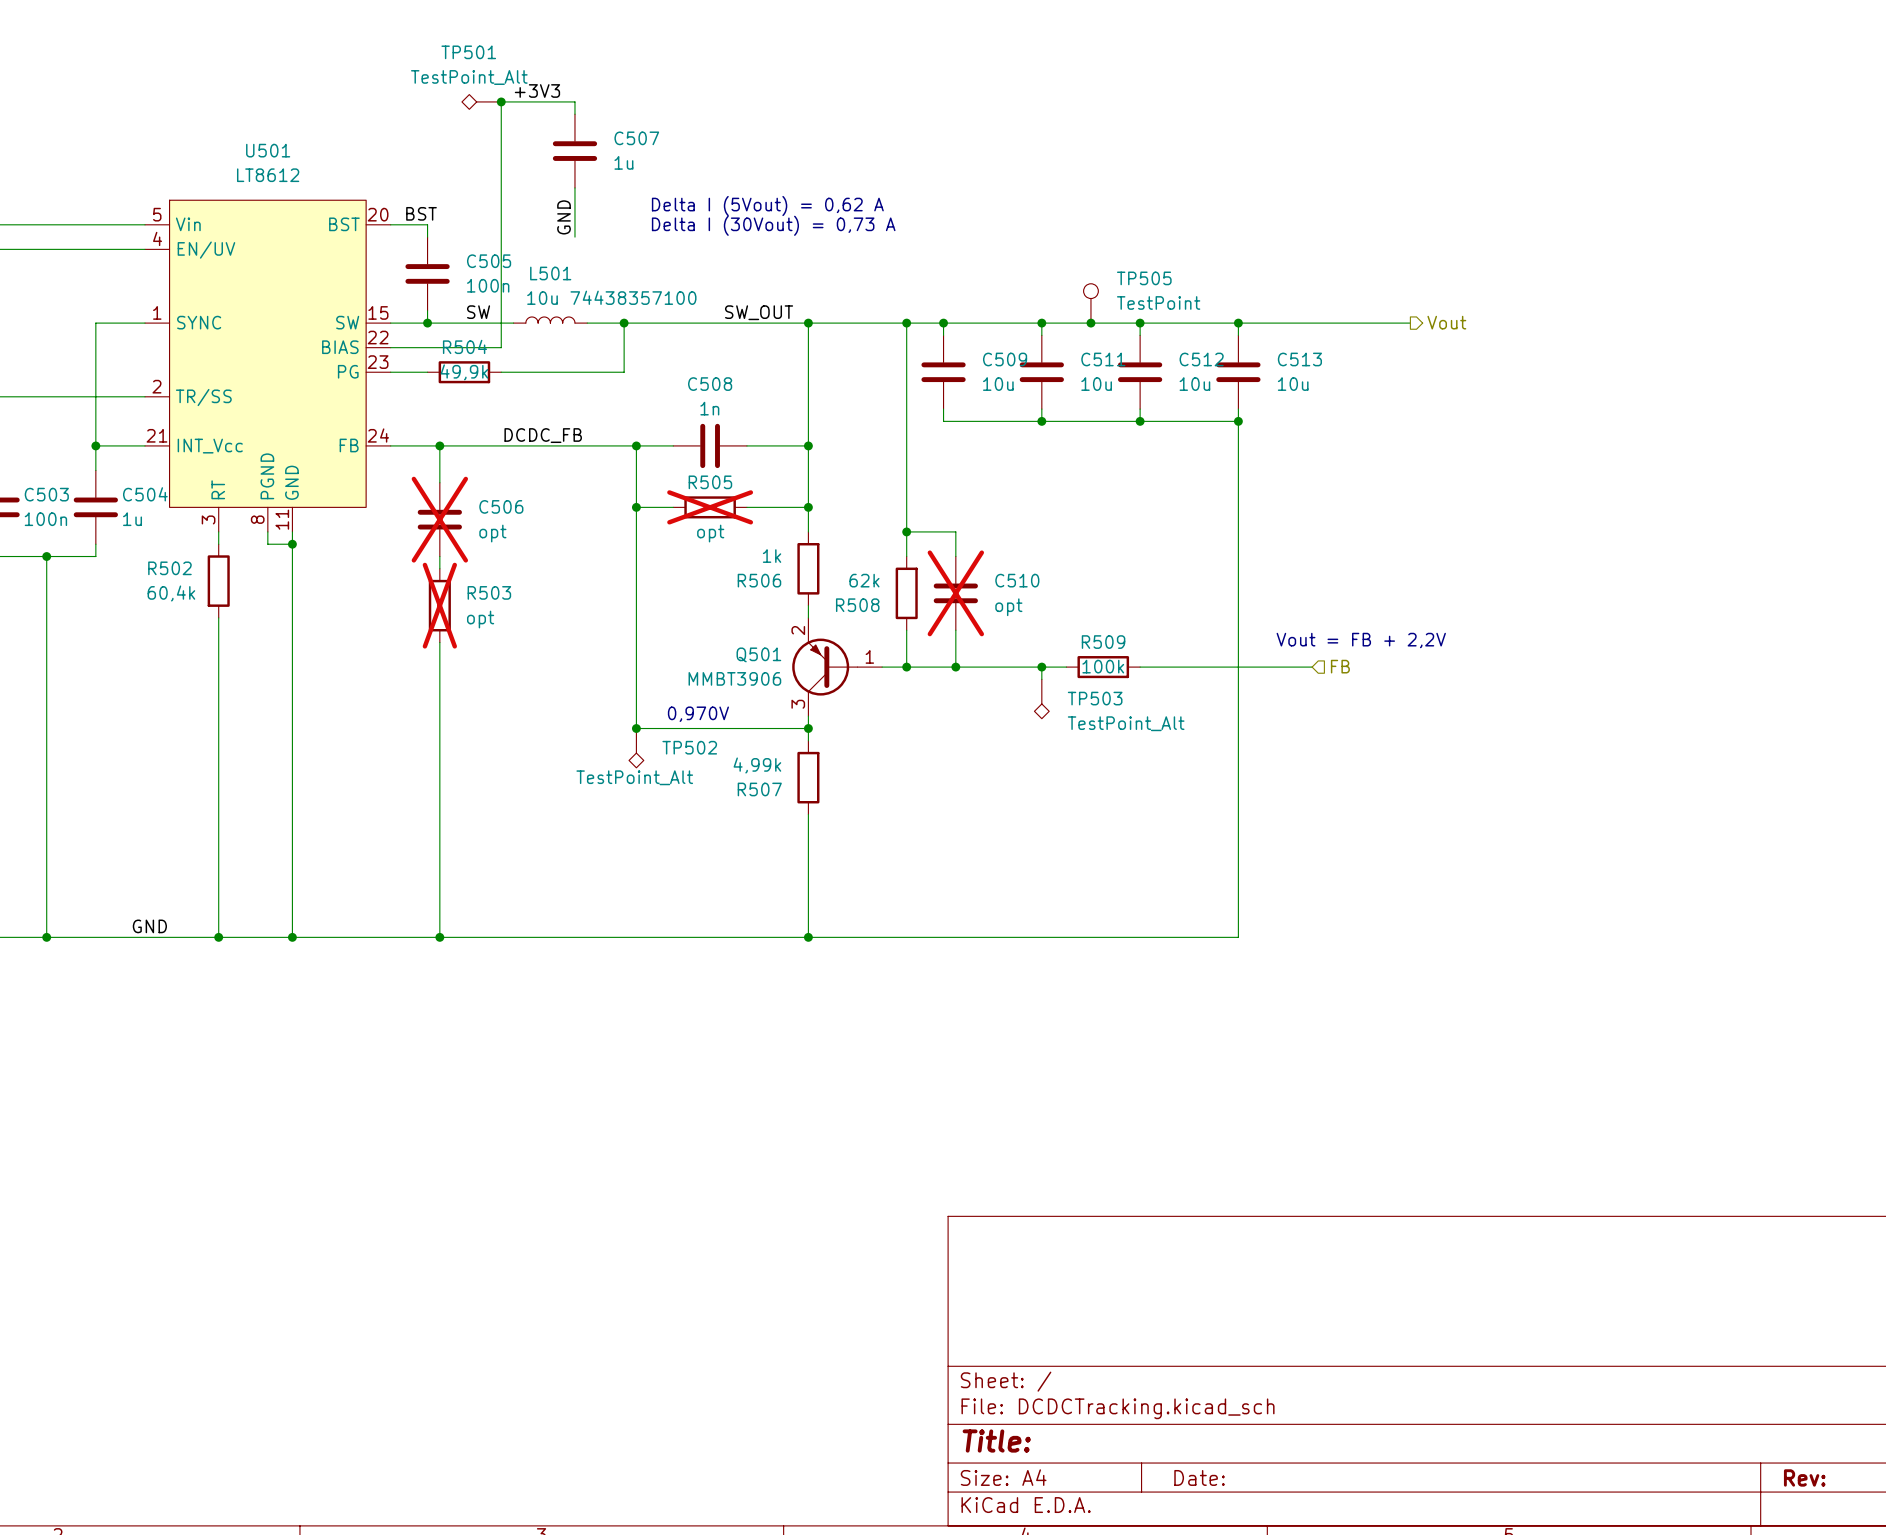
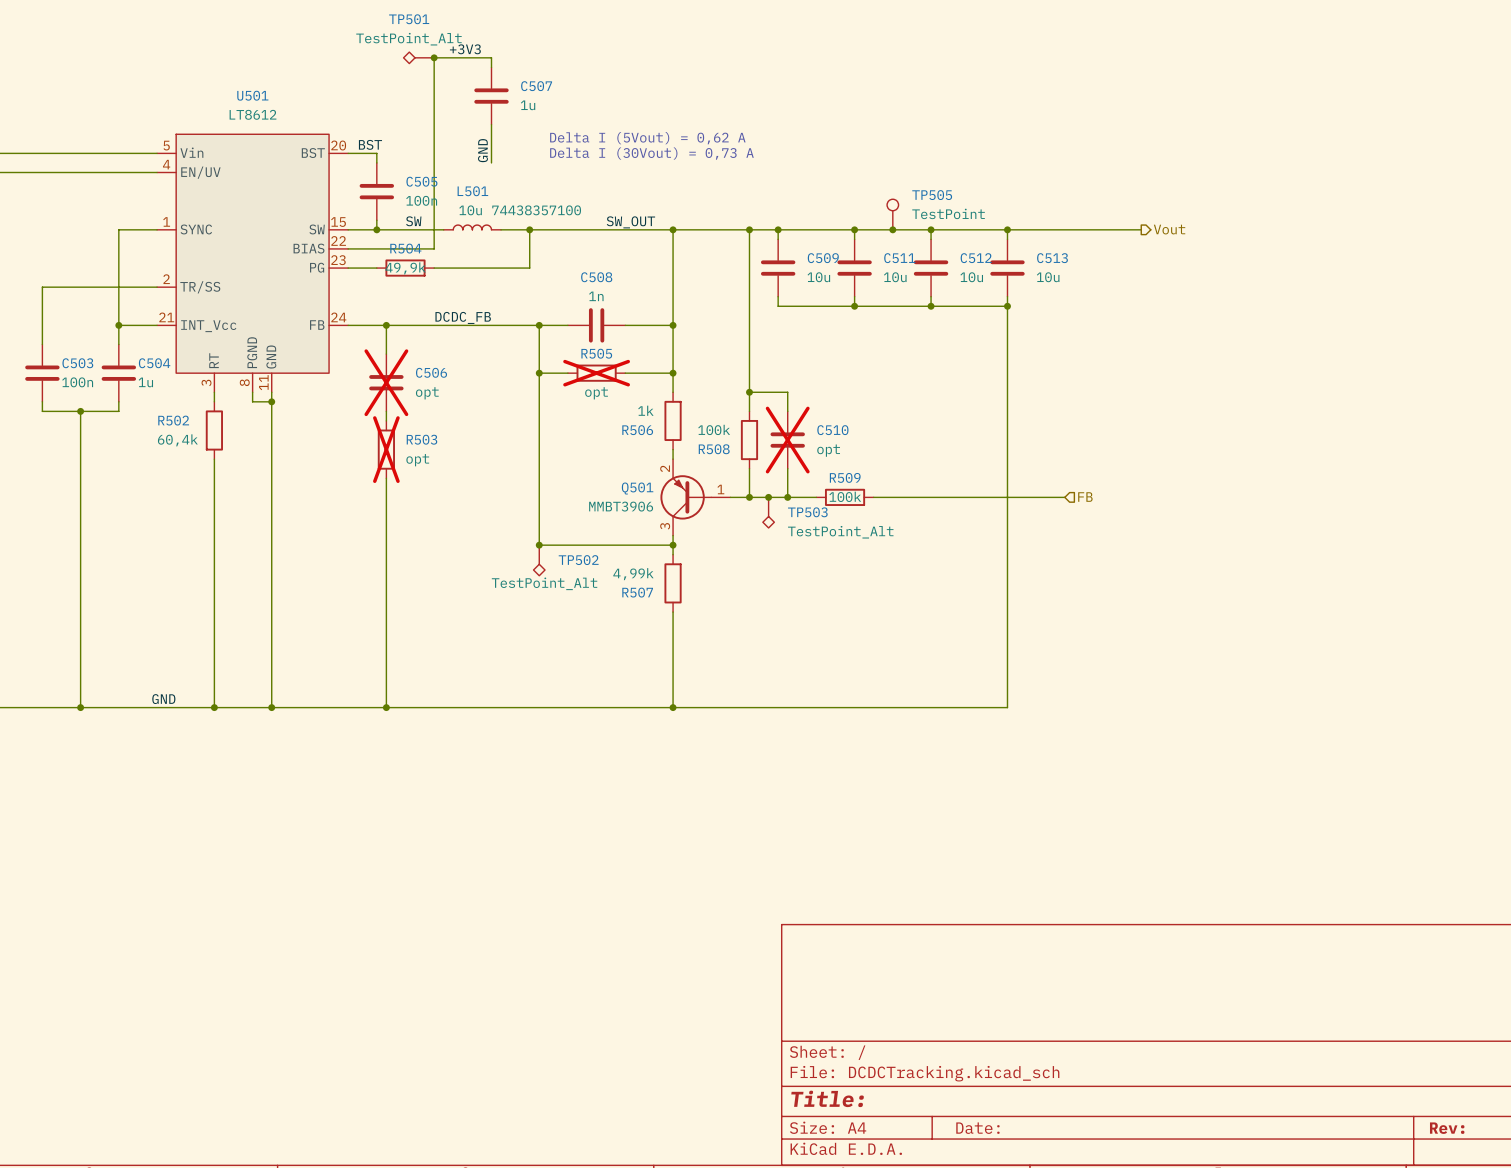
R508 value: 62k (864, 580) -> 100k (714, 429)
text: Vout = FB + 2,2V (1361, 640) -> none
junction: none -> (768, 497)
wire: (1041, 667) (1041, 679) -> none
junction: (1041, 667) -> none
R509 position: (1103, 667) -> (845, 497)
TP503 position: (1041, 699) -> (768, 512)
text: 0,970V (698, 714) -> none

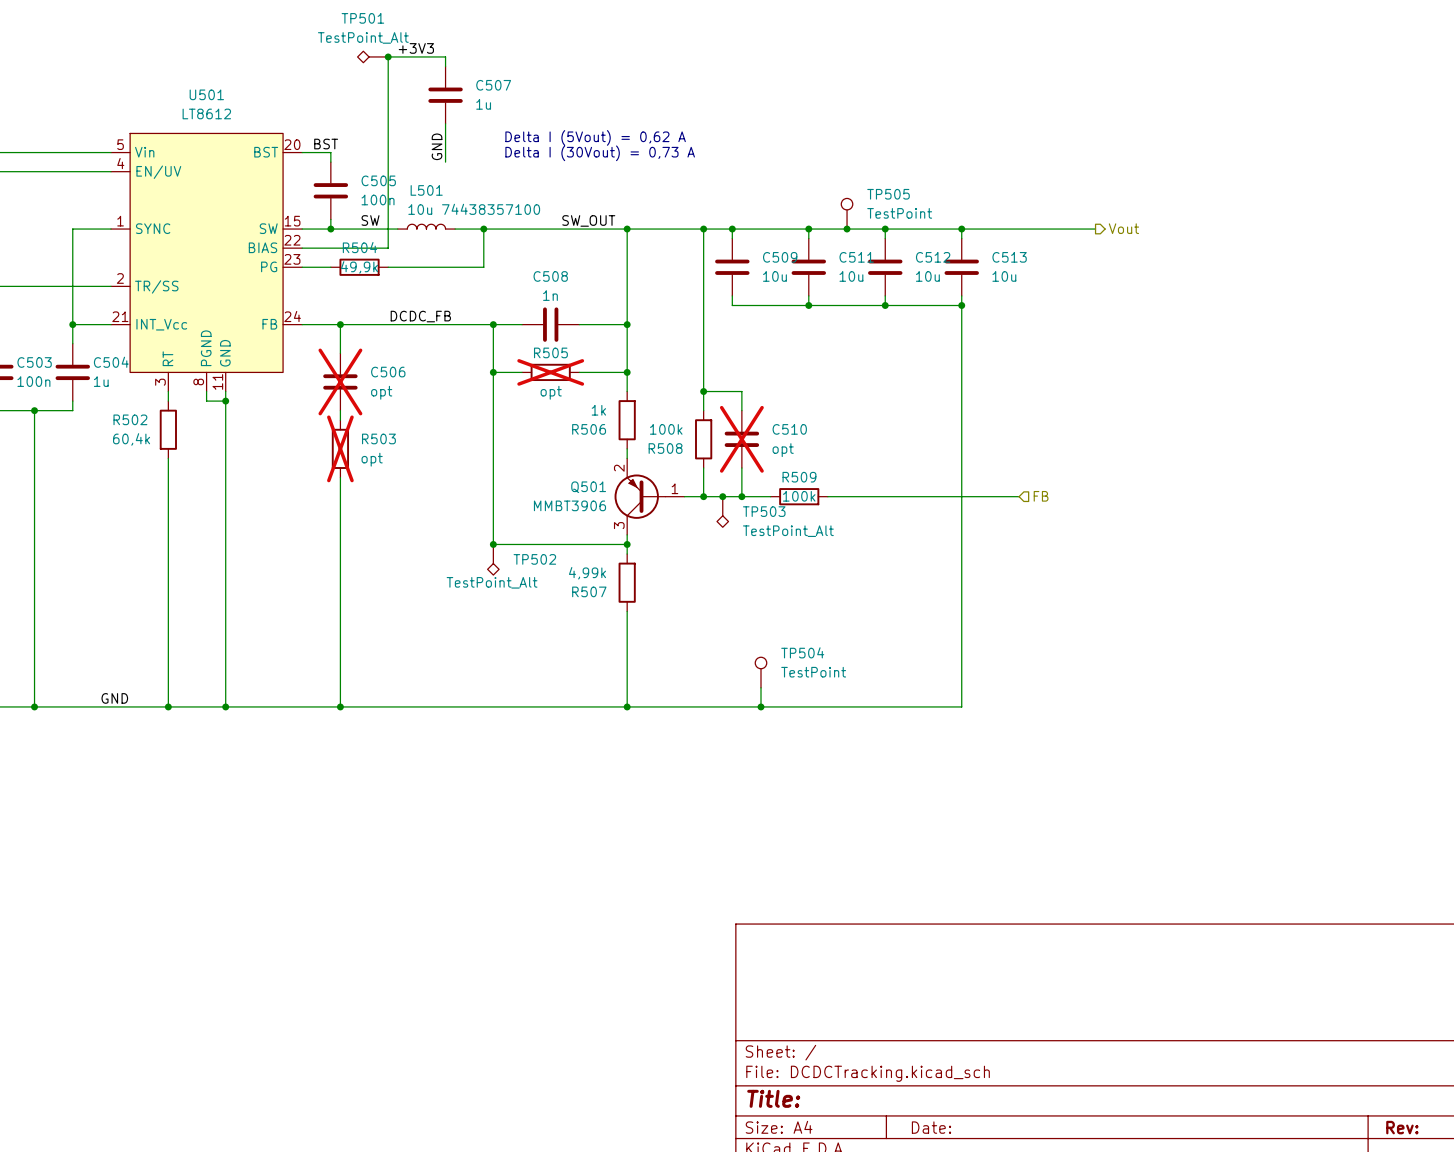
TP504: none -> TestPoint (761, 672)
wire: none -> (761, 687) (761, 706)
junction: none -> (761, 706)

